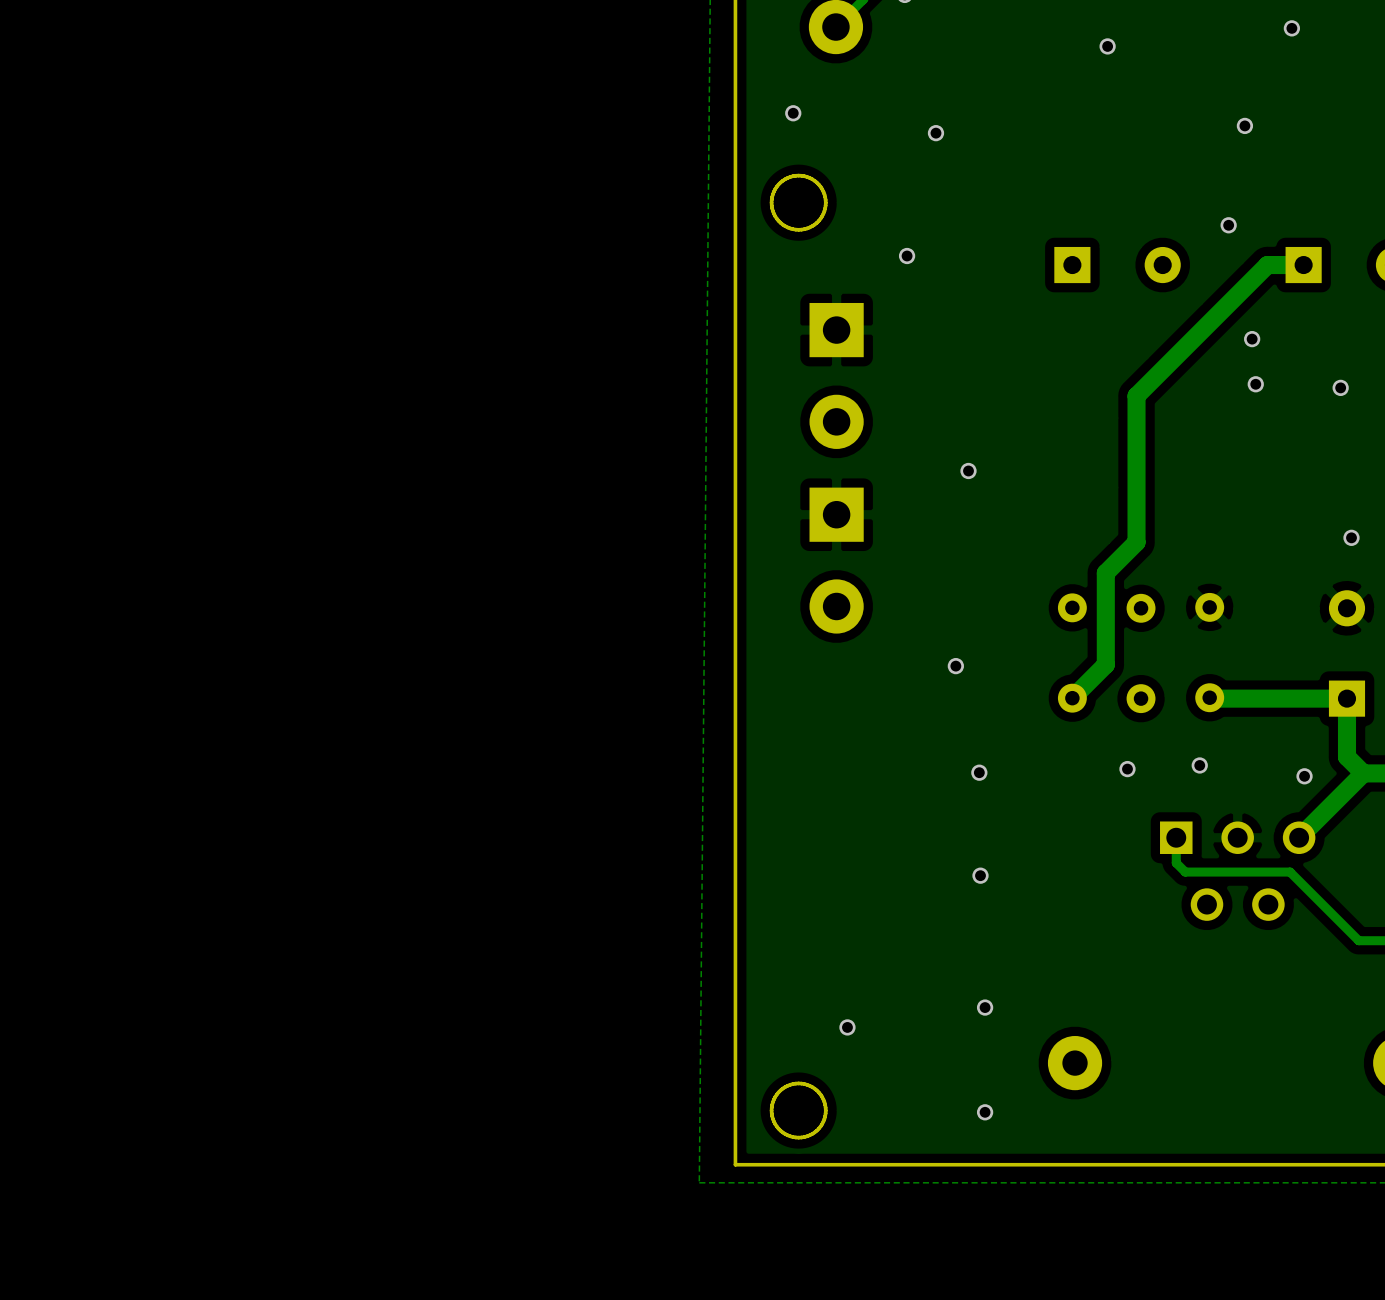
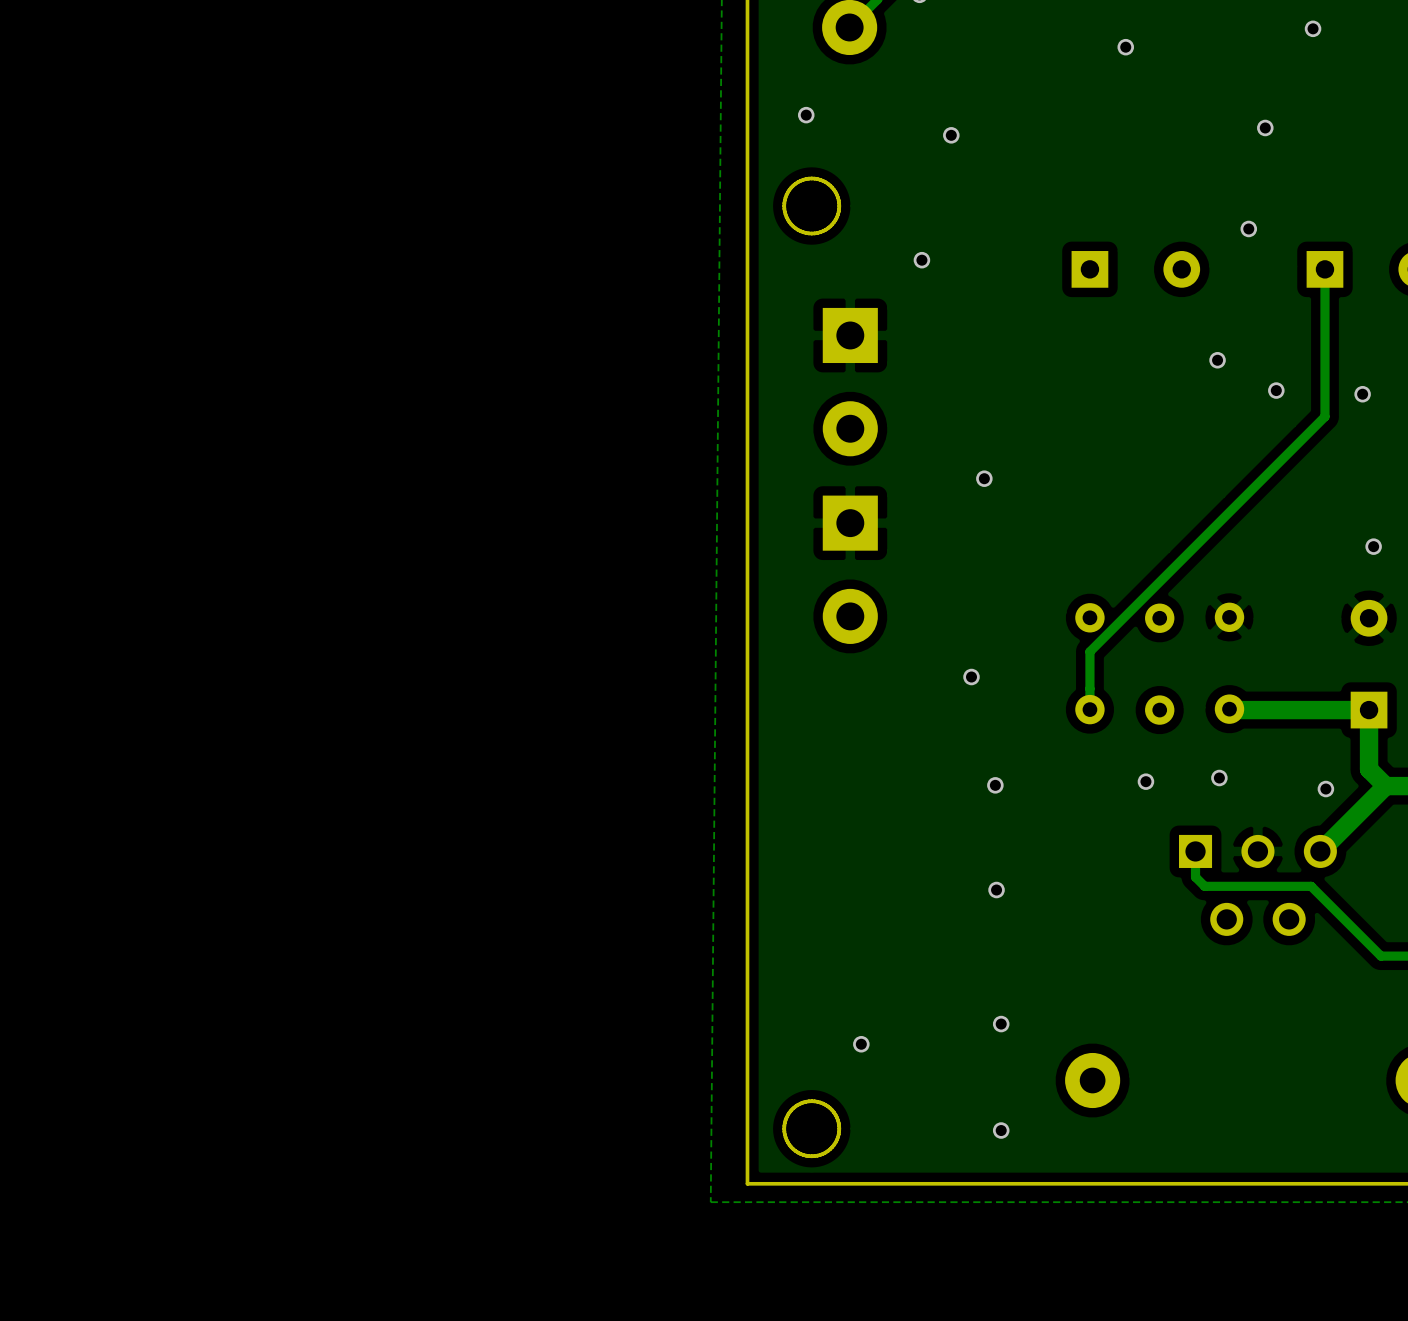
track: (1303, 265) (1267, 265) (1136, 396) (1136, 542) (1105, 573) (1105, 664) (1072, 698) -> (1324, 269) (1324, 416) (1089, 651) (1089, 709)
via position: (1252, 339) -> (1217, 360)

